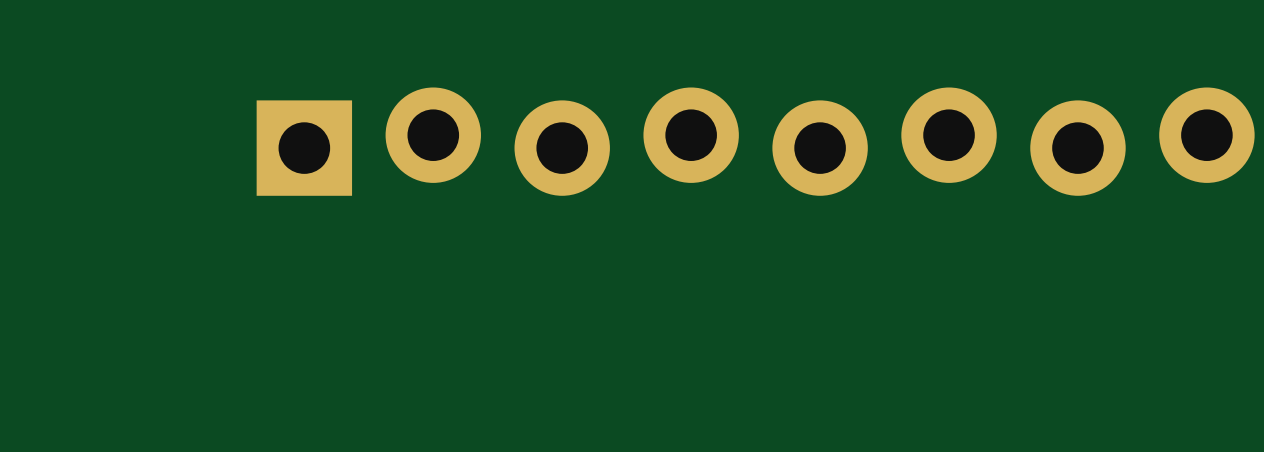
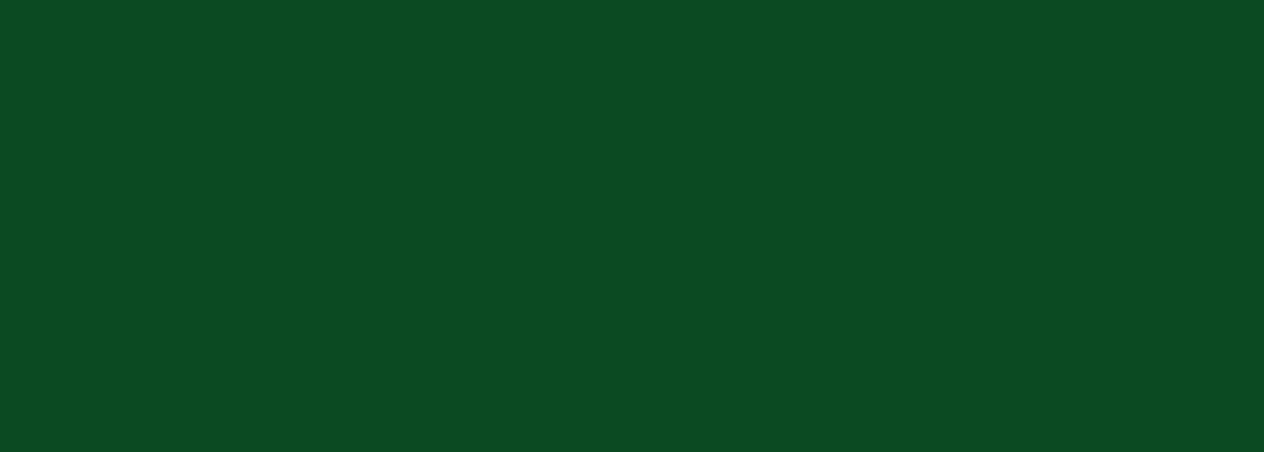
part: (755, 141) -> none

